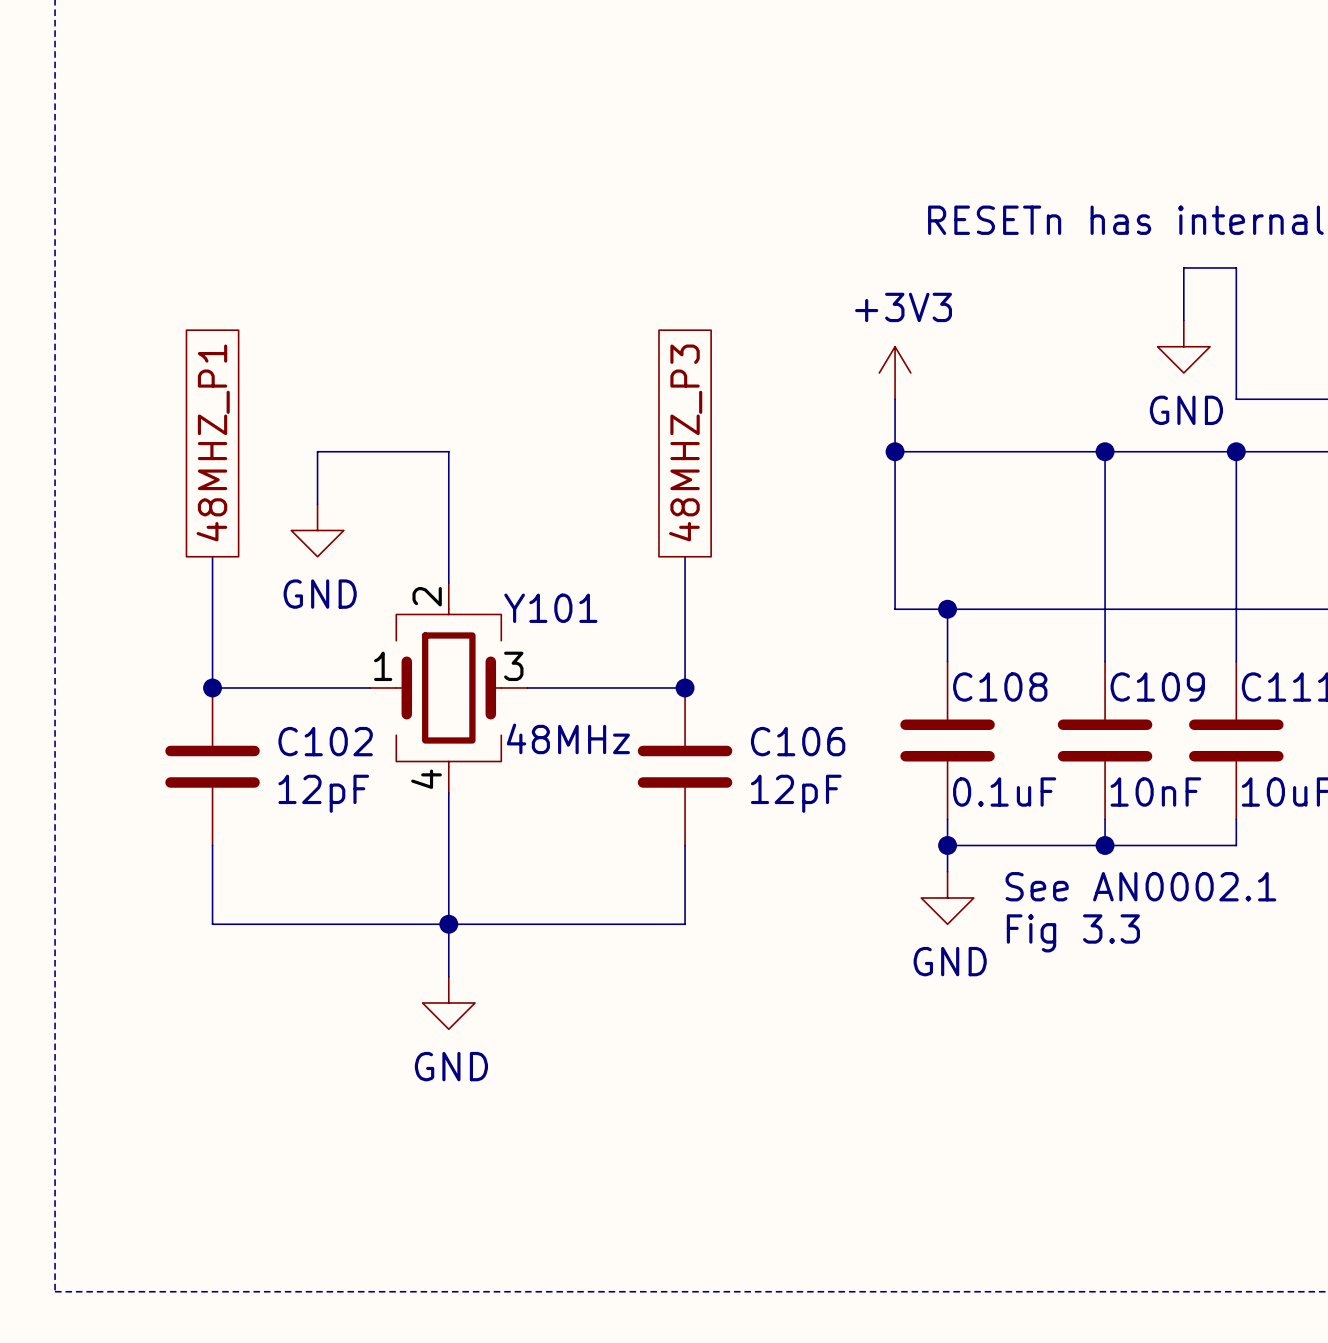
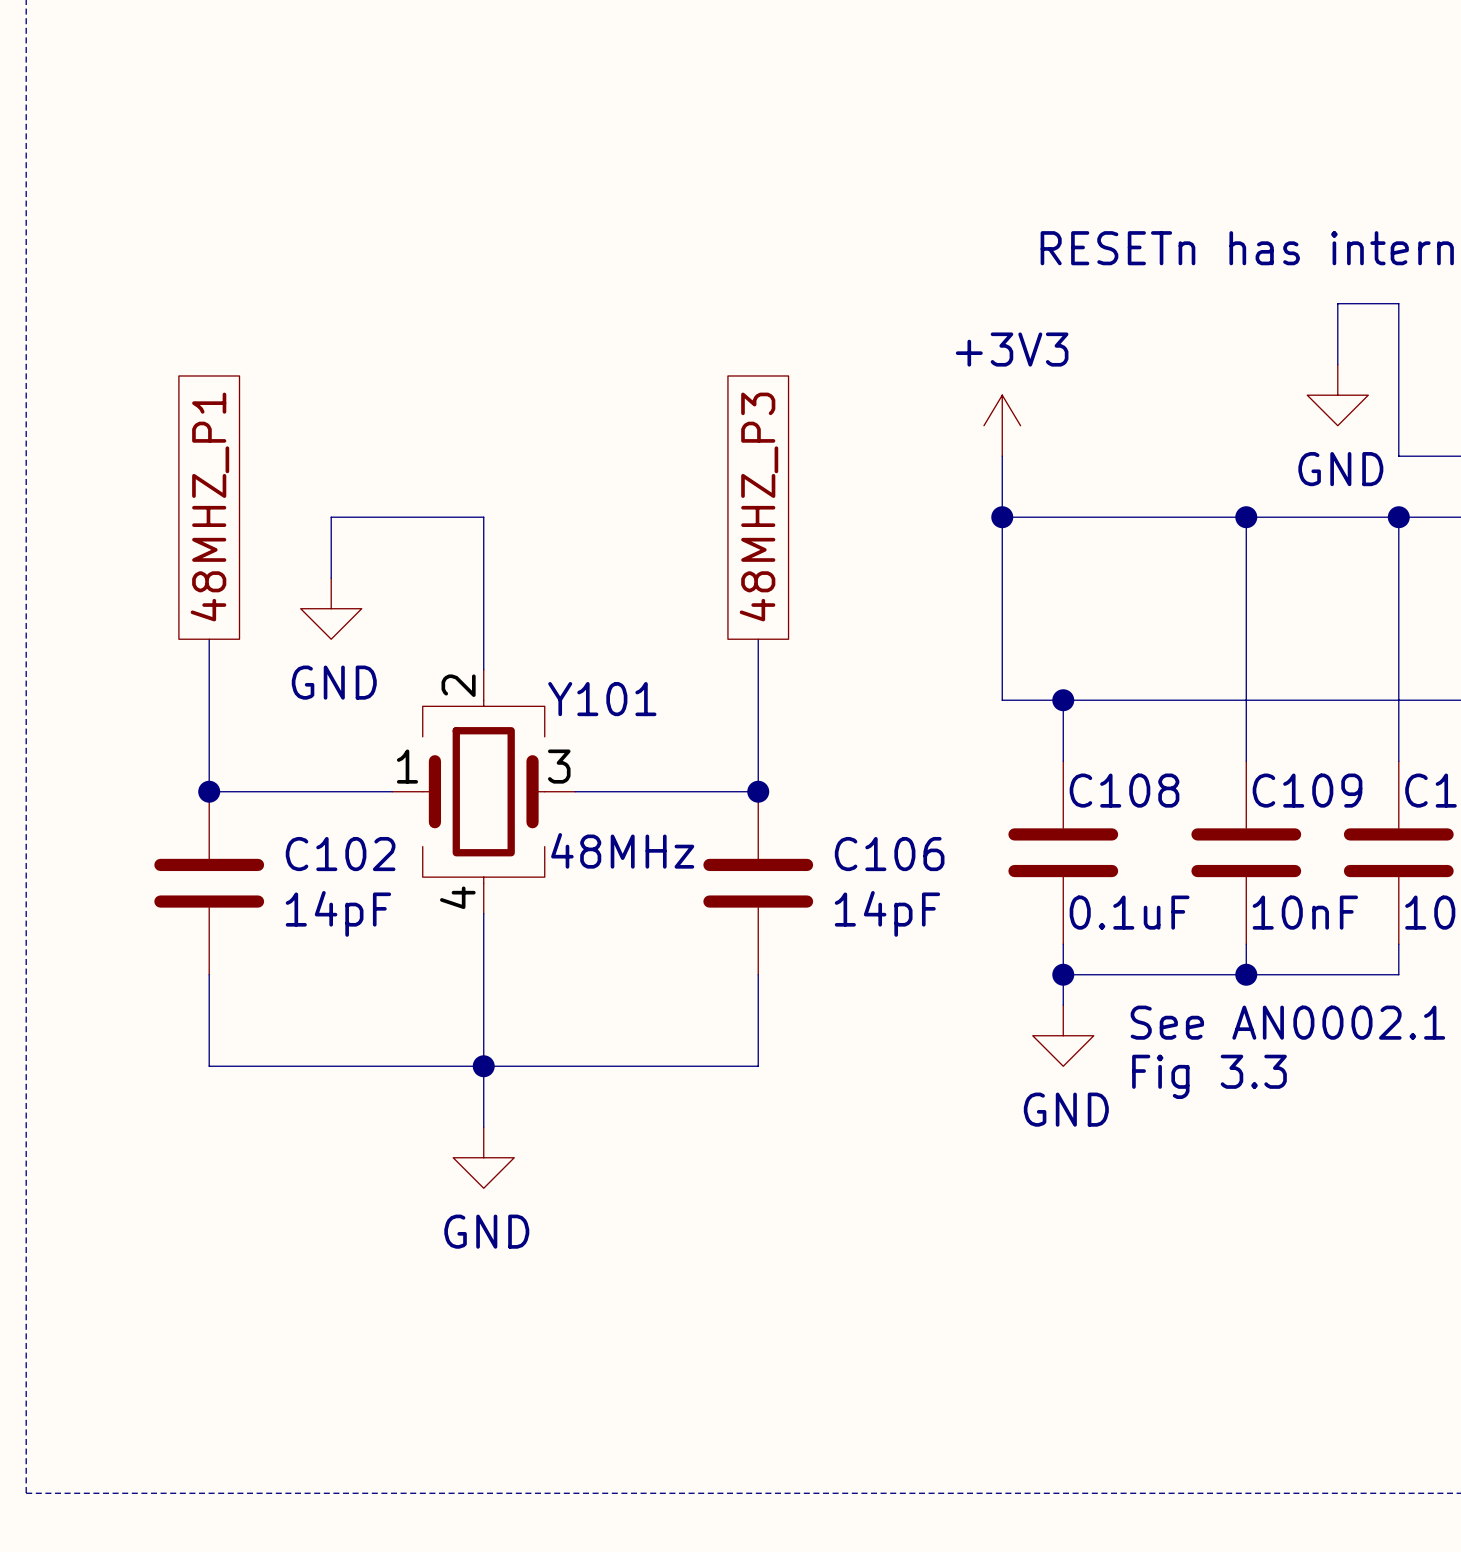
C102 value: 12pF (323, 793) -> 14pF (338, 913)
C106 value: 12pF (796, 793) -> 14pF (887, 913)

